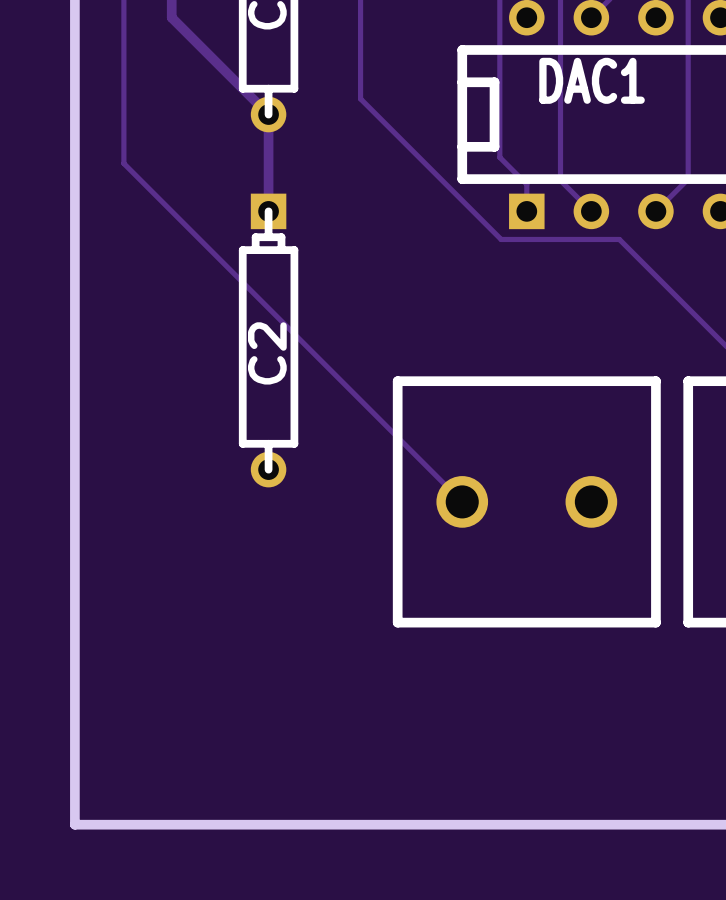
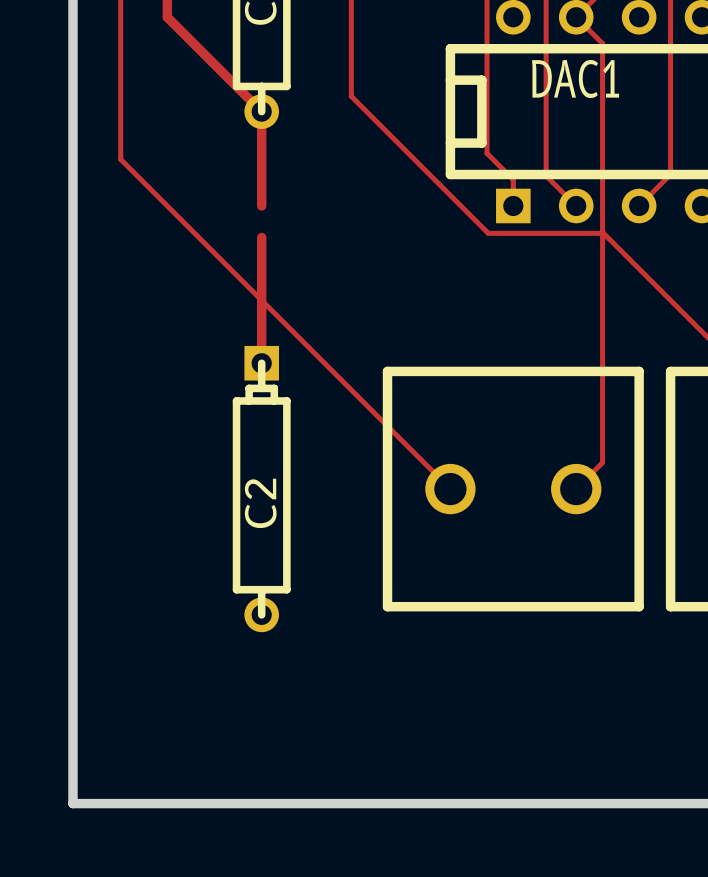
track: none -> (576, 17) (602, 43) (602, 462) (576, 489)
track: none -> (261, 237) (261, 363)
C2 position: (268, 340) -> (261, 489)

